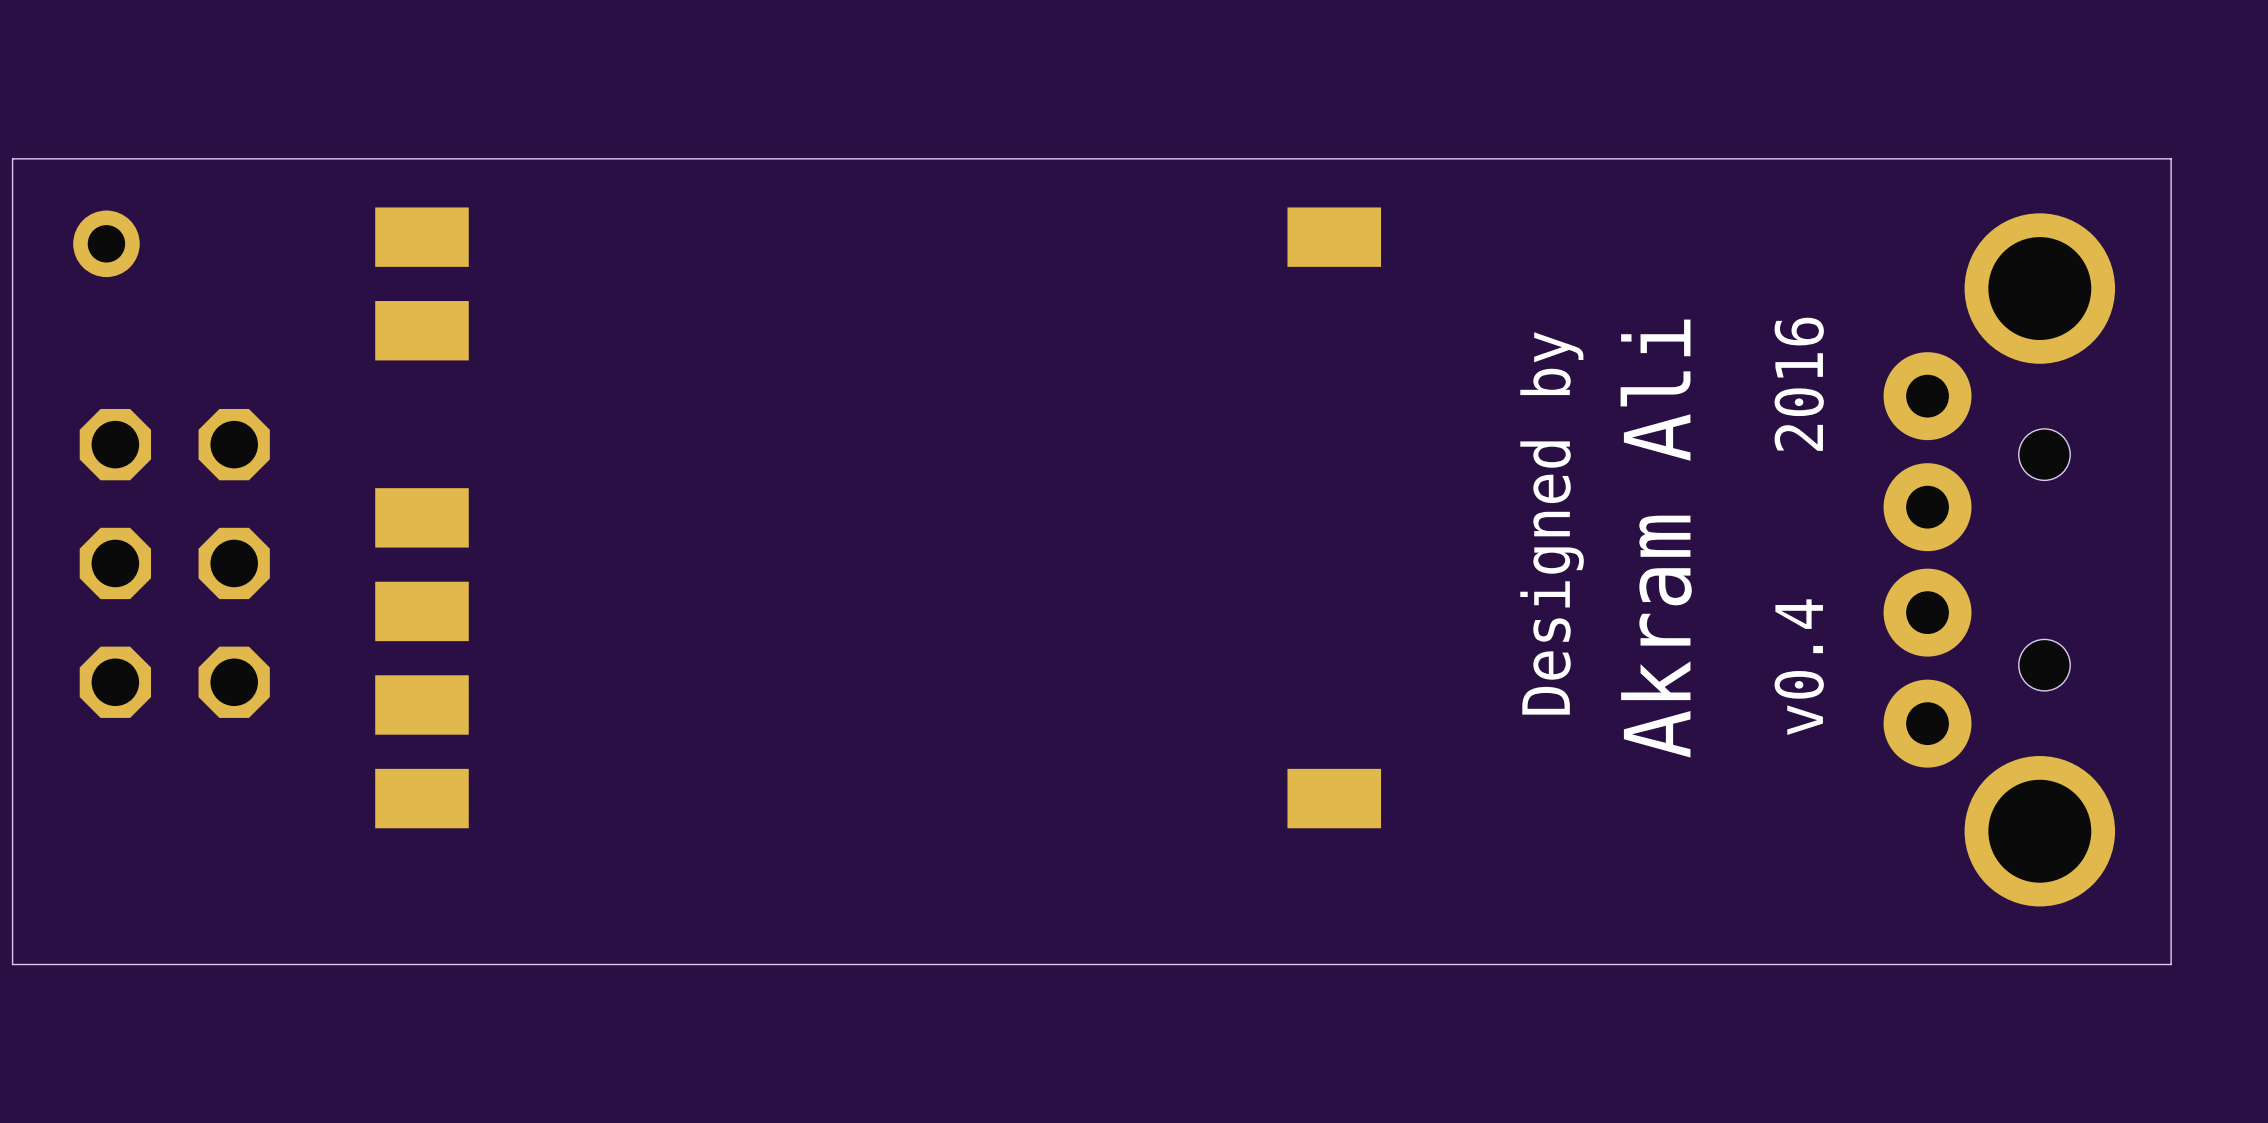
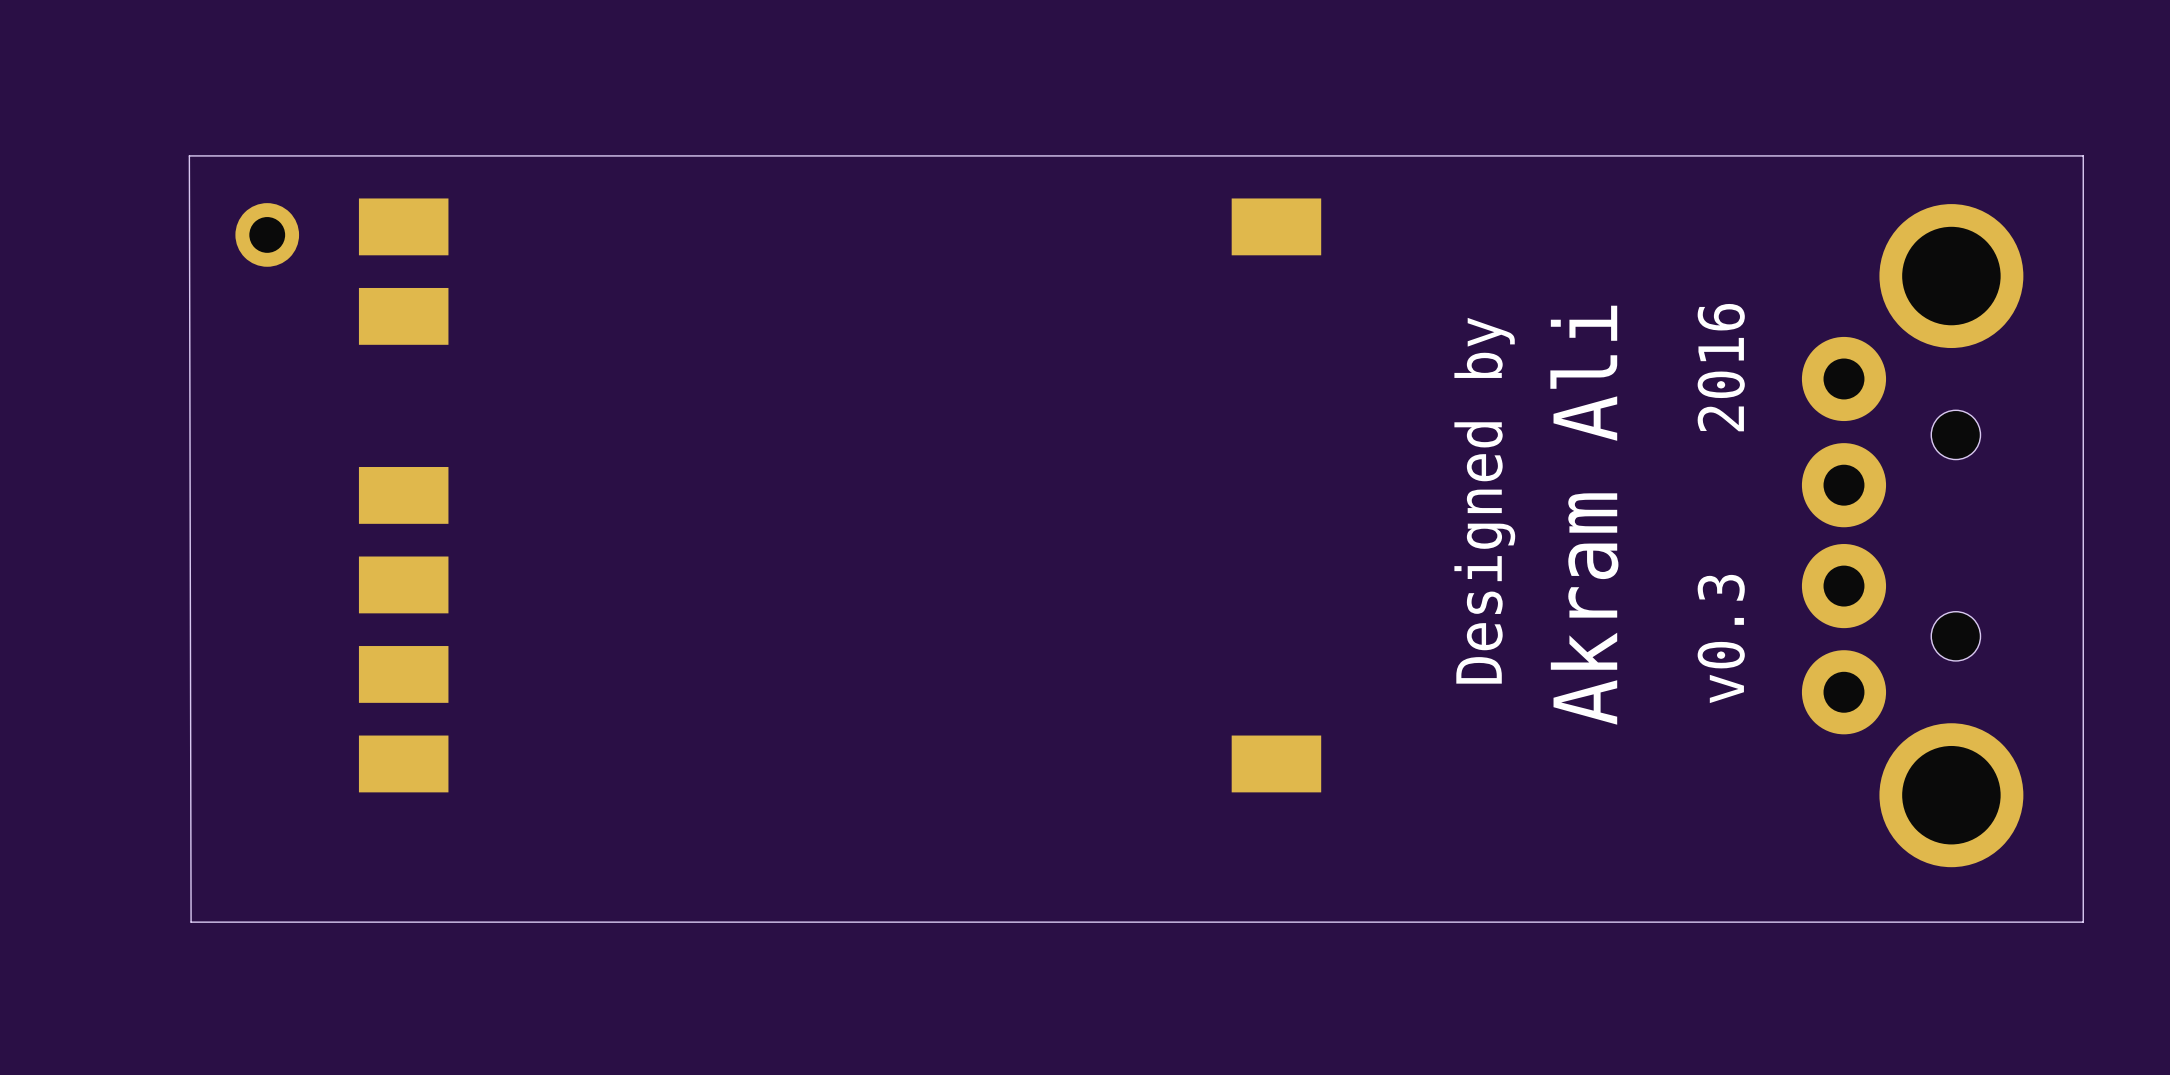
board edge: (2171, 158) (2171, 964) (12, 964) (12, 158) (2171, 158) -> (2083, 155) (2083, 922) (191, 922) (189, 155) (2083, 155)
part position: (106, 243) -> (267, 234)
text: v0.4 2016 (1799, 526) -> v0.3 2016 (1721, 503)
part: (174, 563) -> none

